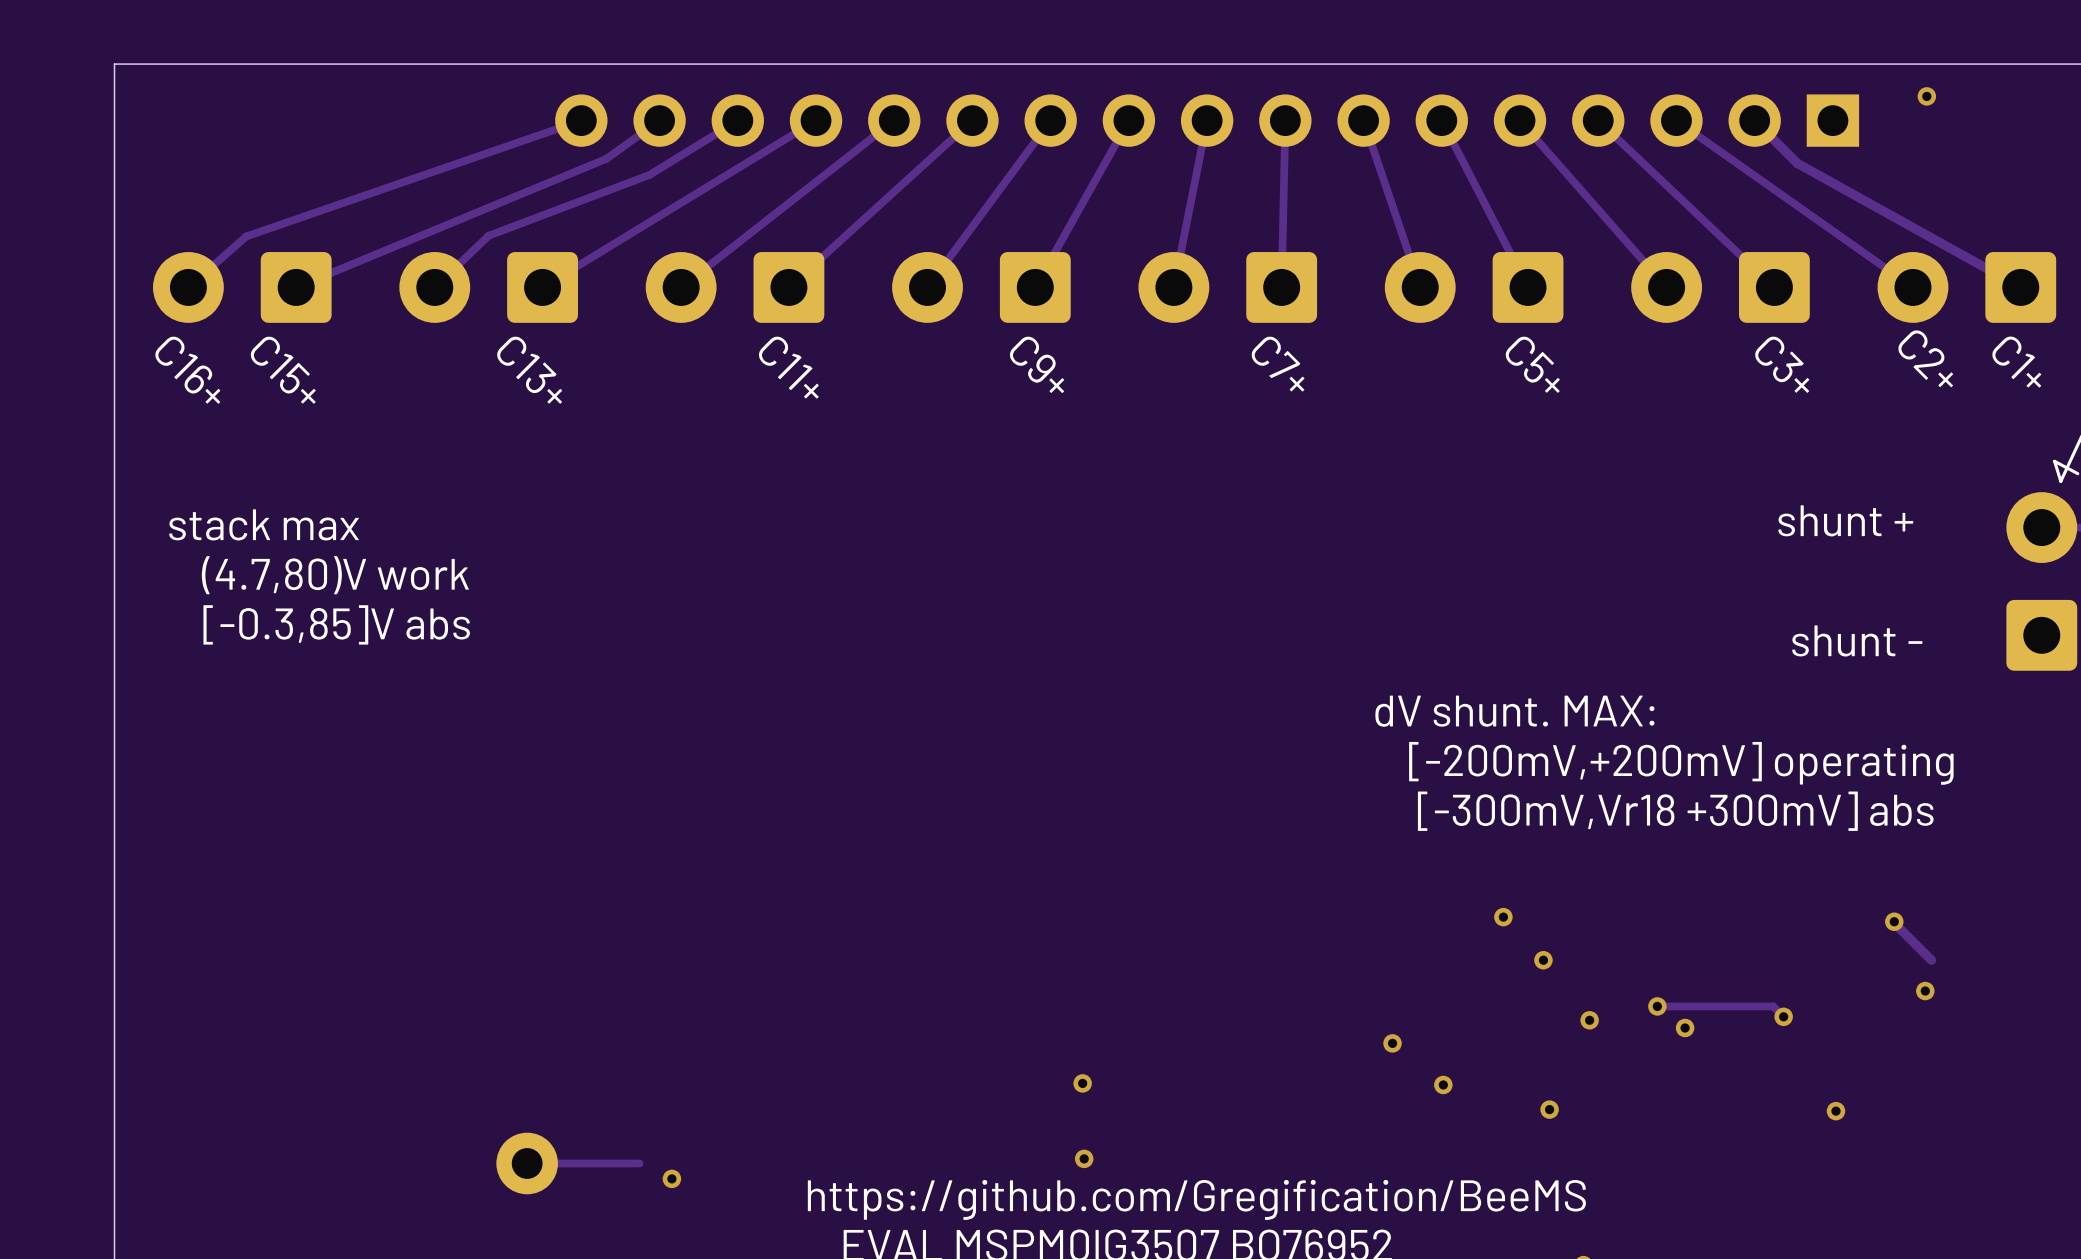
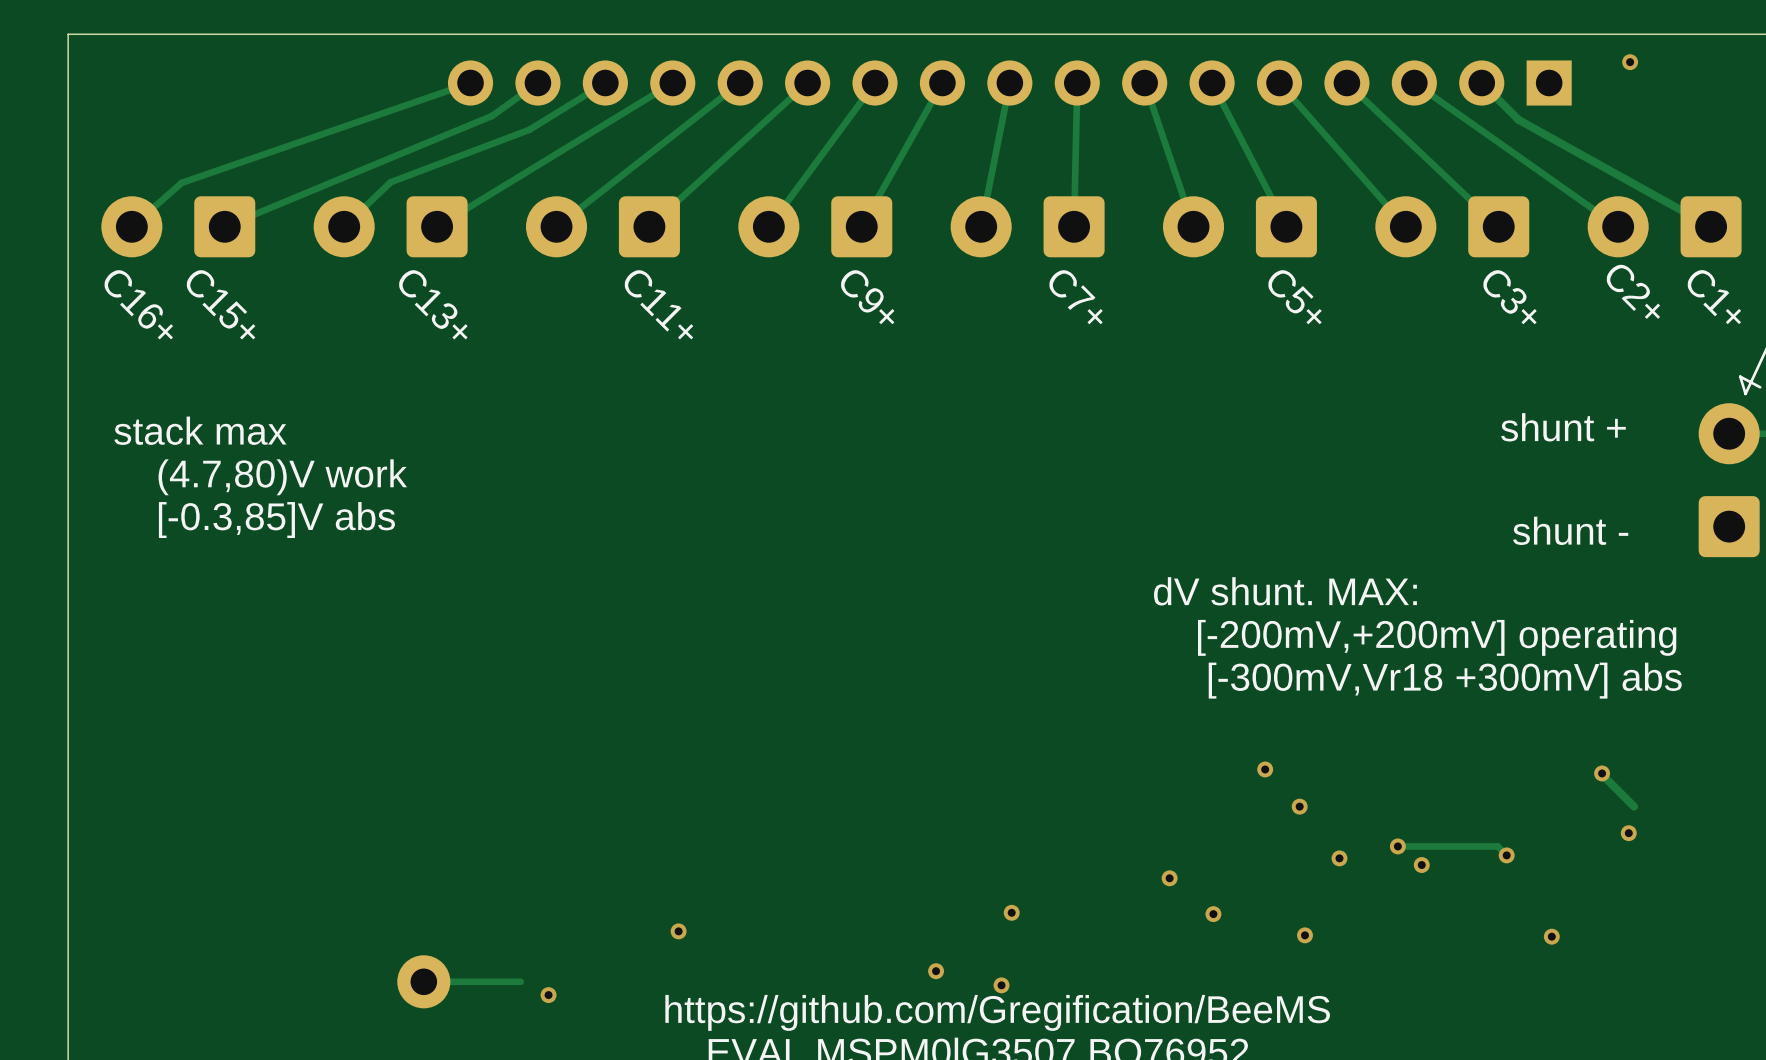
via: (1082, 1083) -> none
via: none -> (1011, 912)
via: none -> (678, 931)
via position: (1084, 1158) -> (936, 971)
via: none -> (1001, 985)

